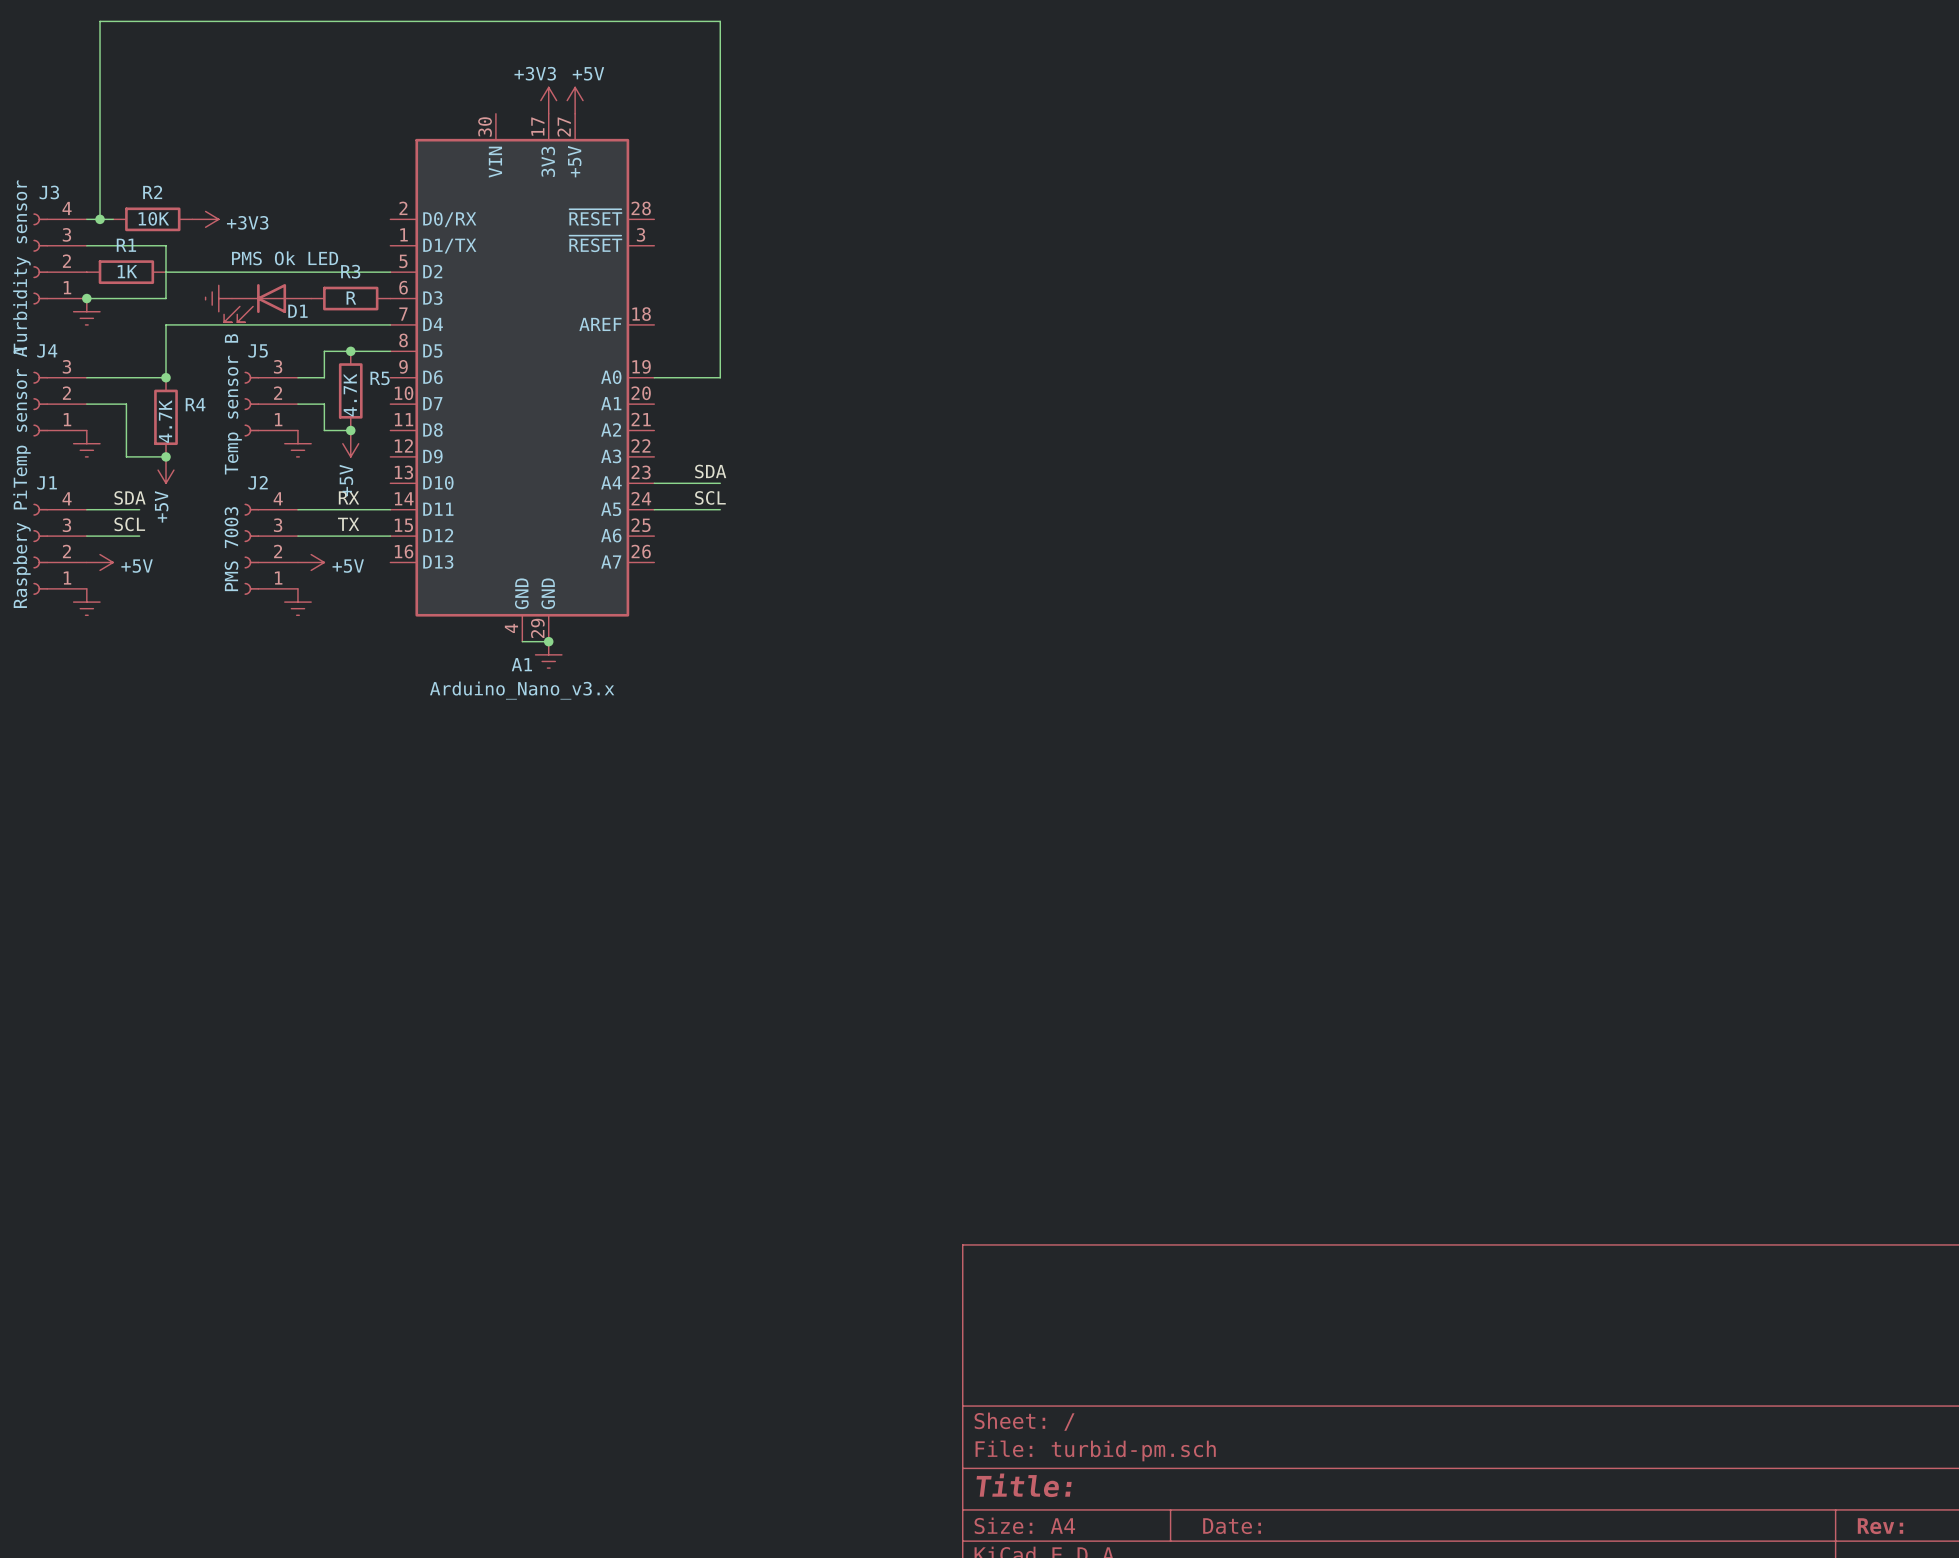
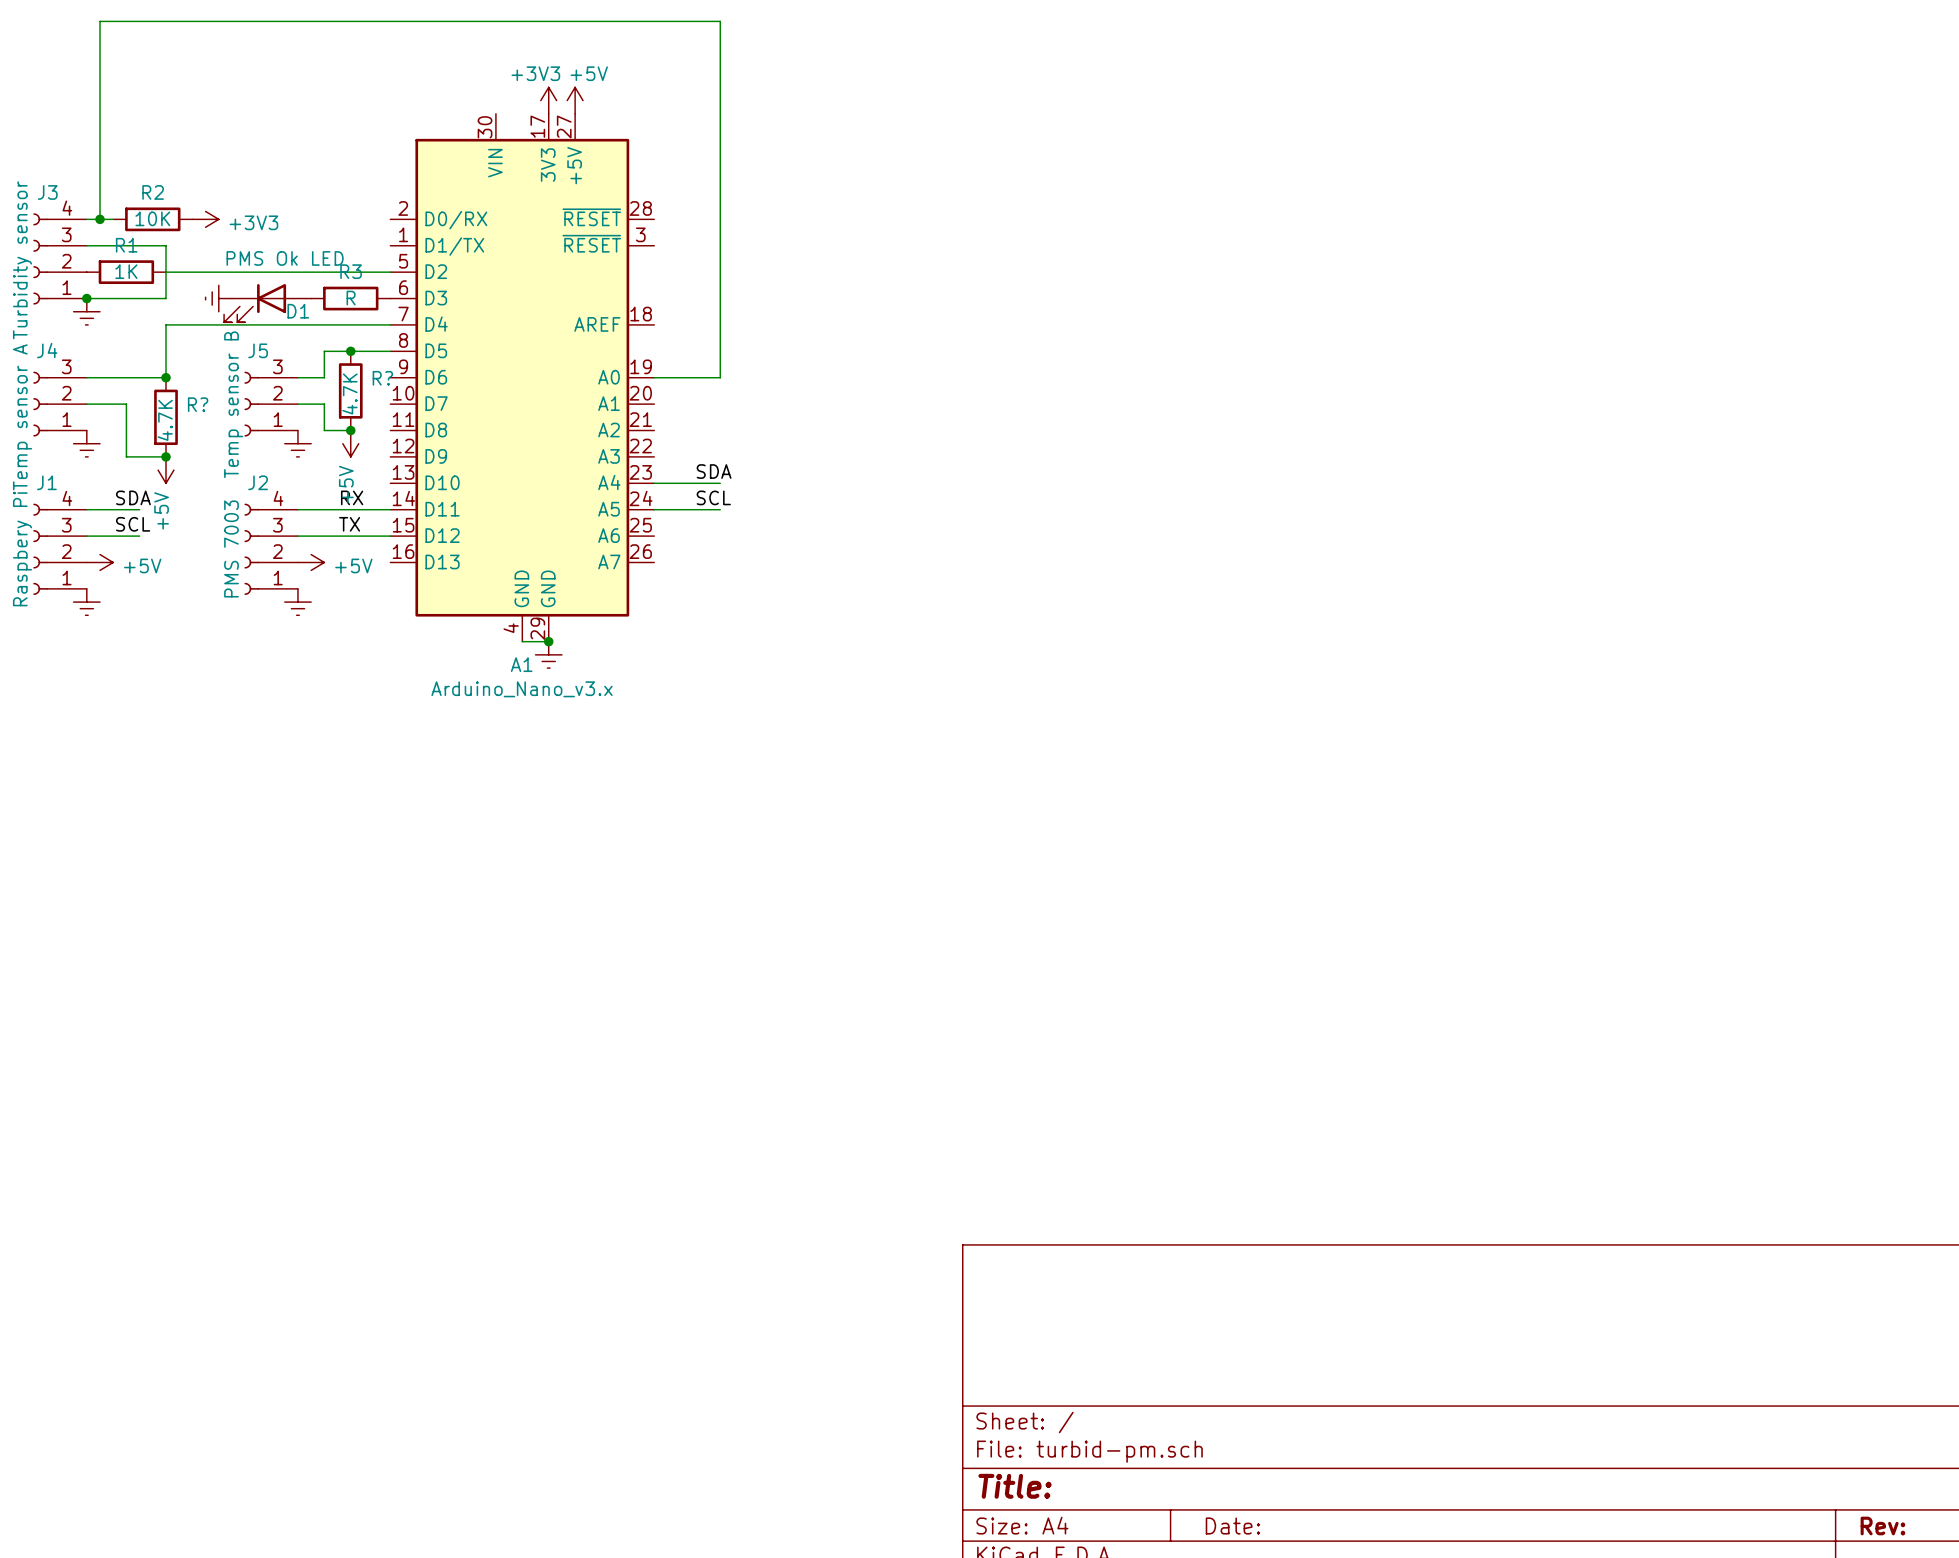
R5 name: R5 (380, 378) -> R? (382, 378)
R4 name: R4 (195, 404) -> R? (198, 404)

